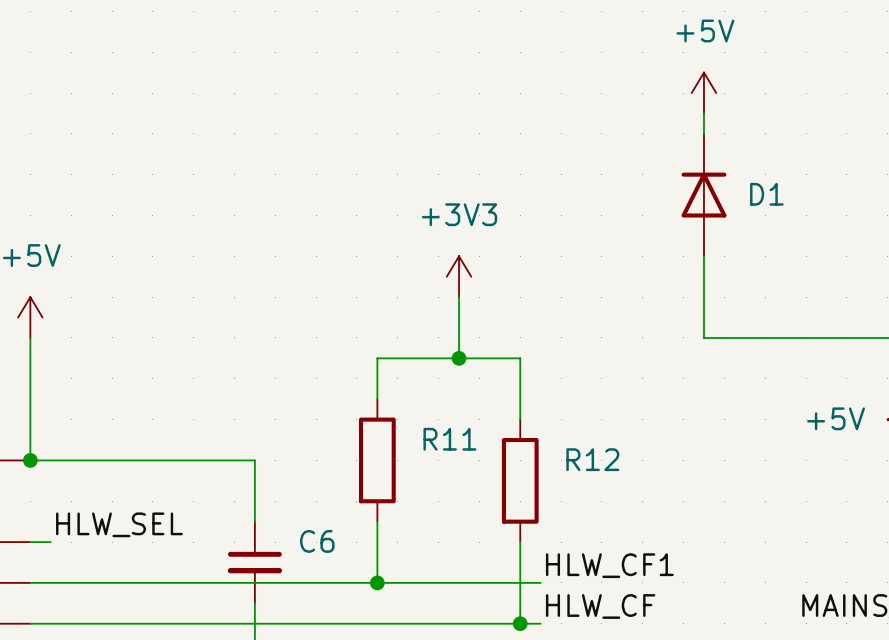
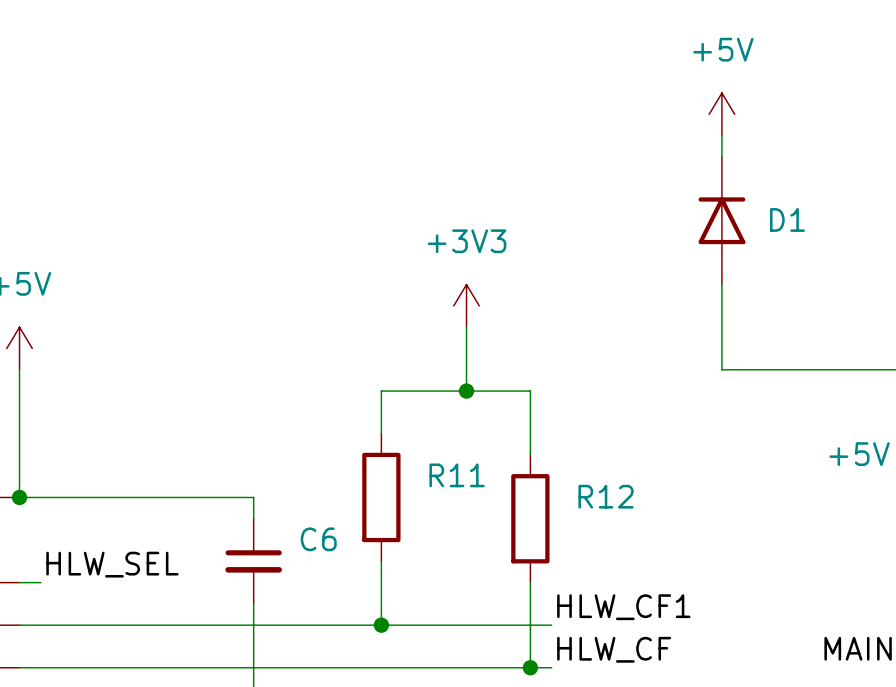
C6 position: (254, 562) -> (253, 561)

